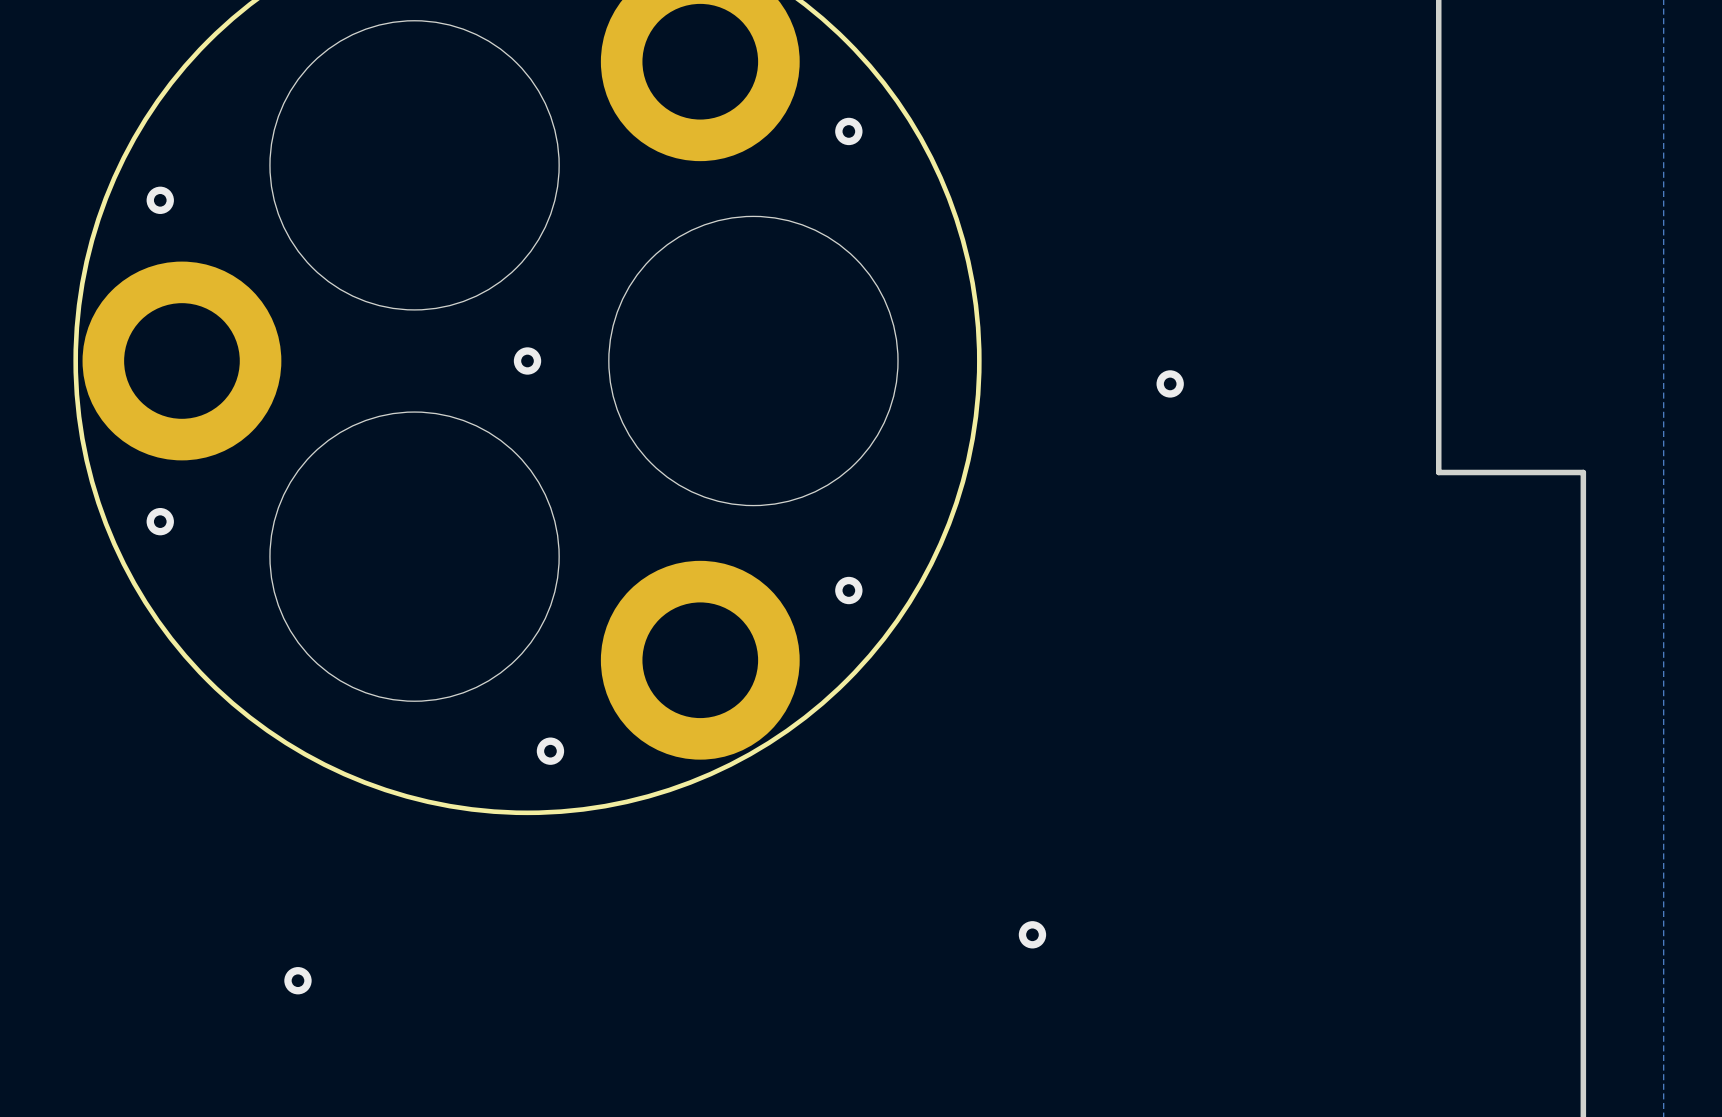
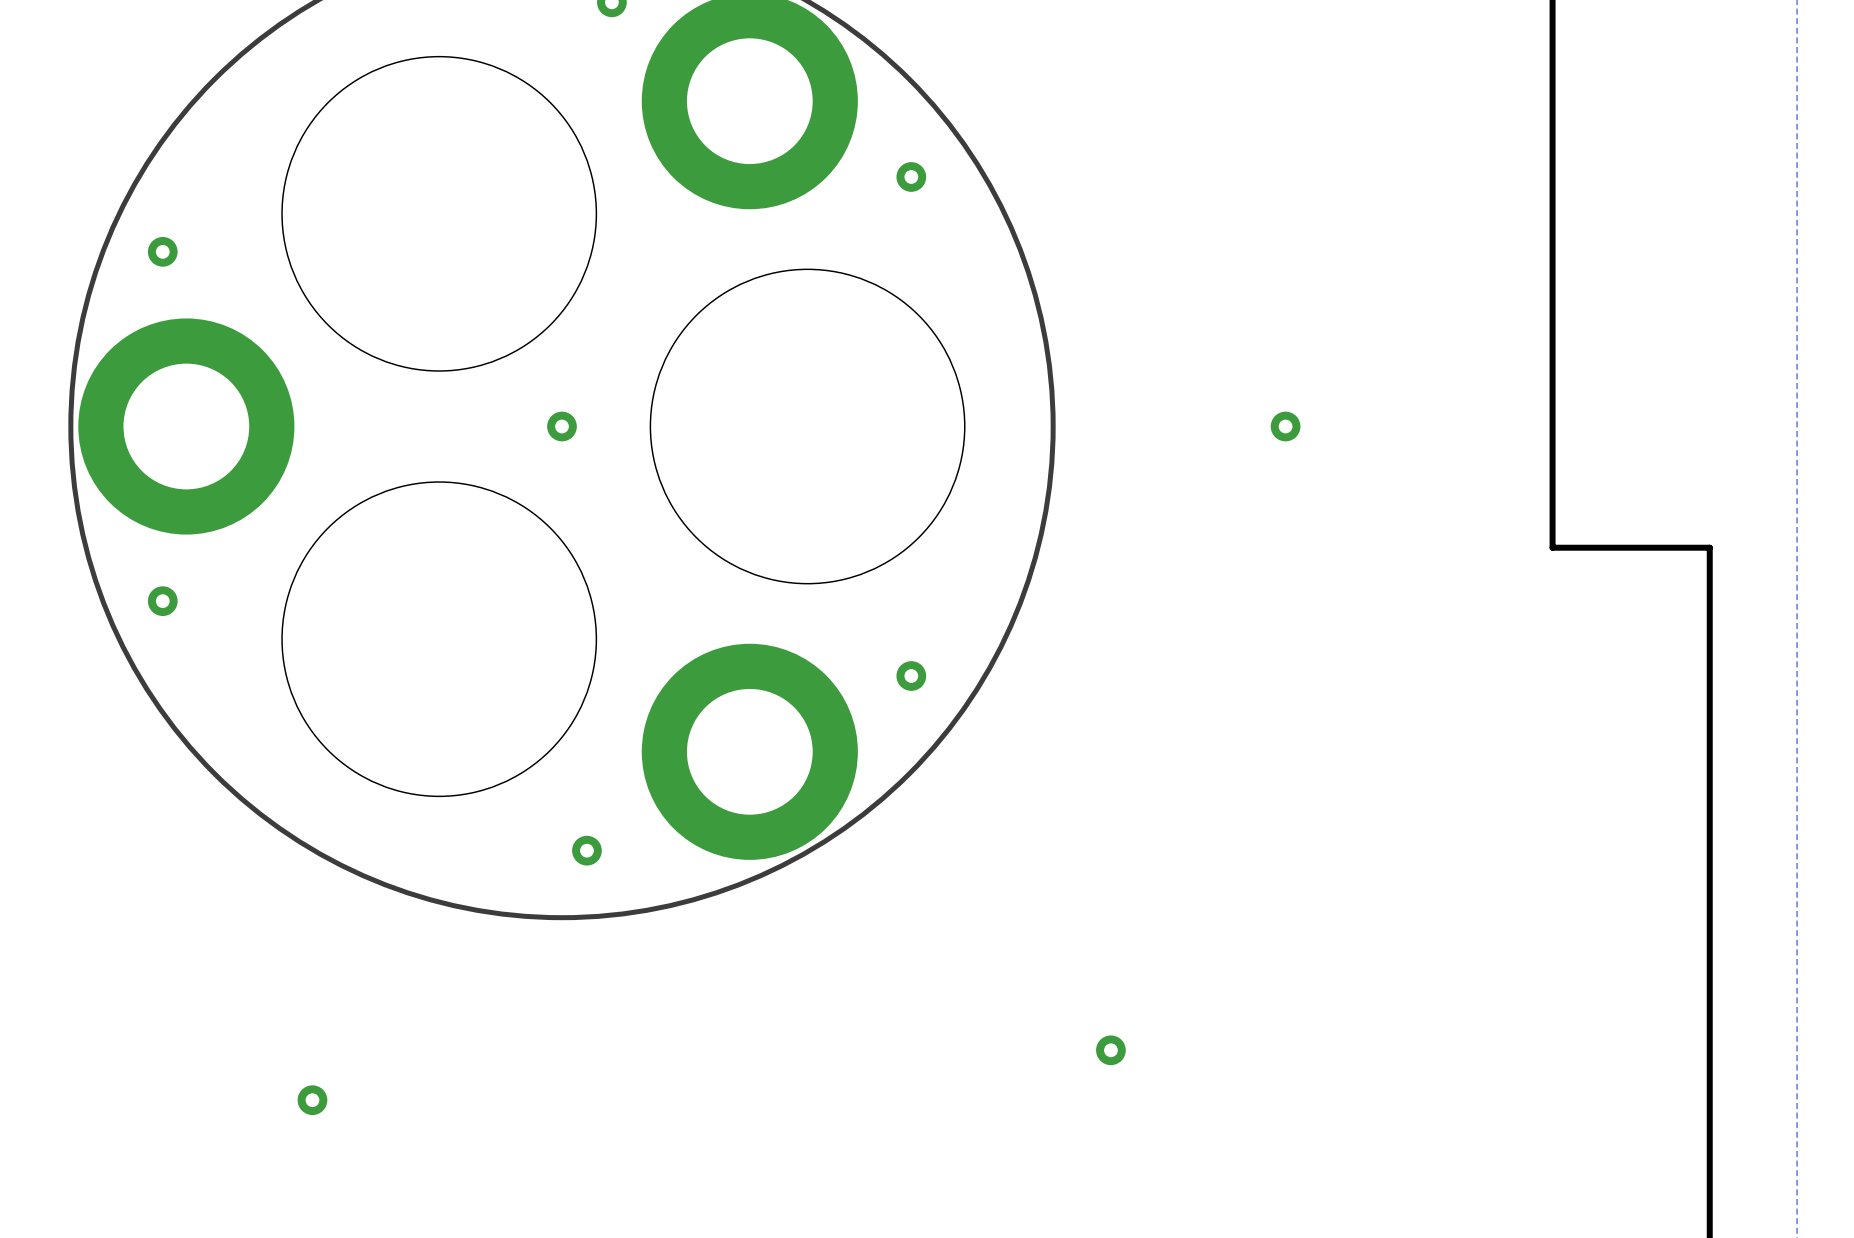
via position: (1170, 383) -> (1285, 426)

